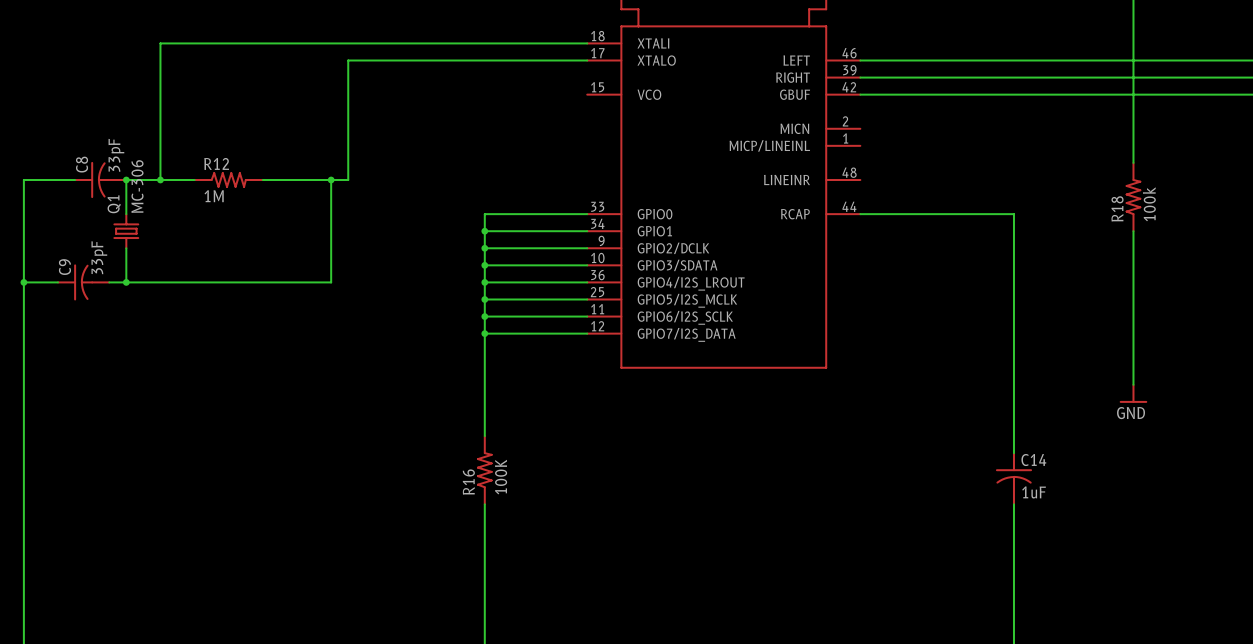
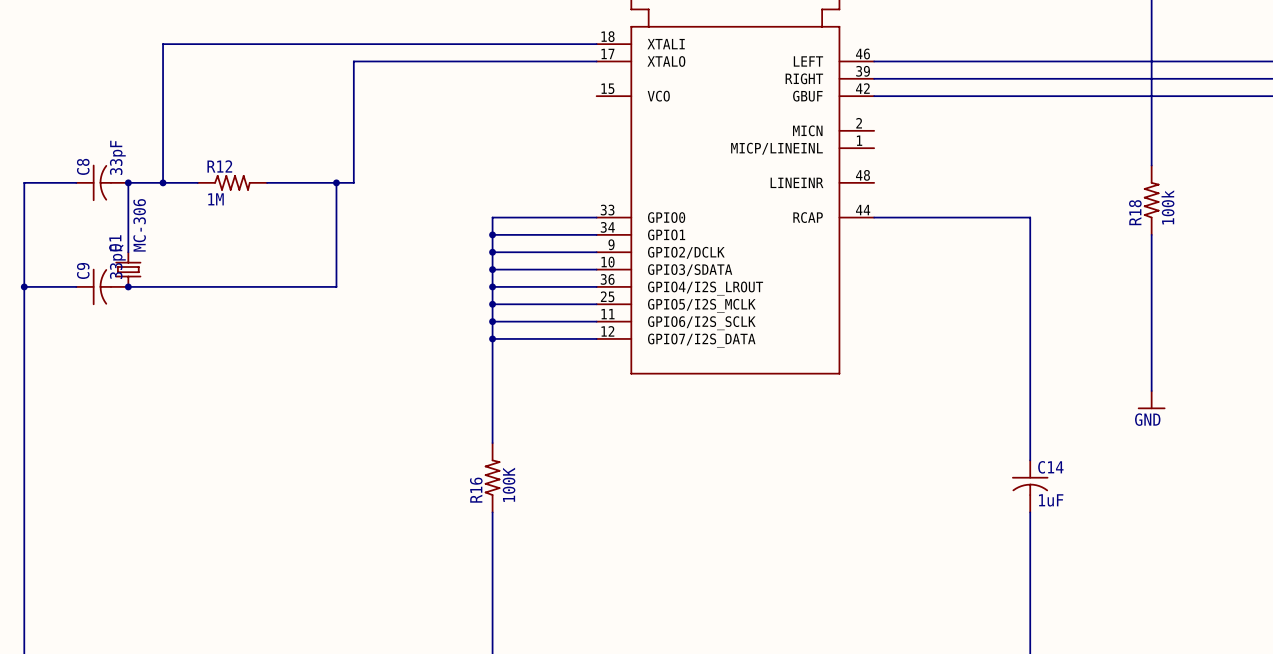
Q1 position: (126, 231) -> (128, 269)
C9 position: (83, 282) -> (102, 286)

